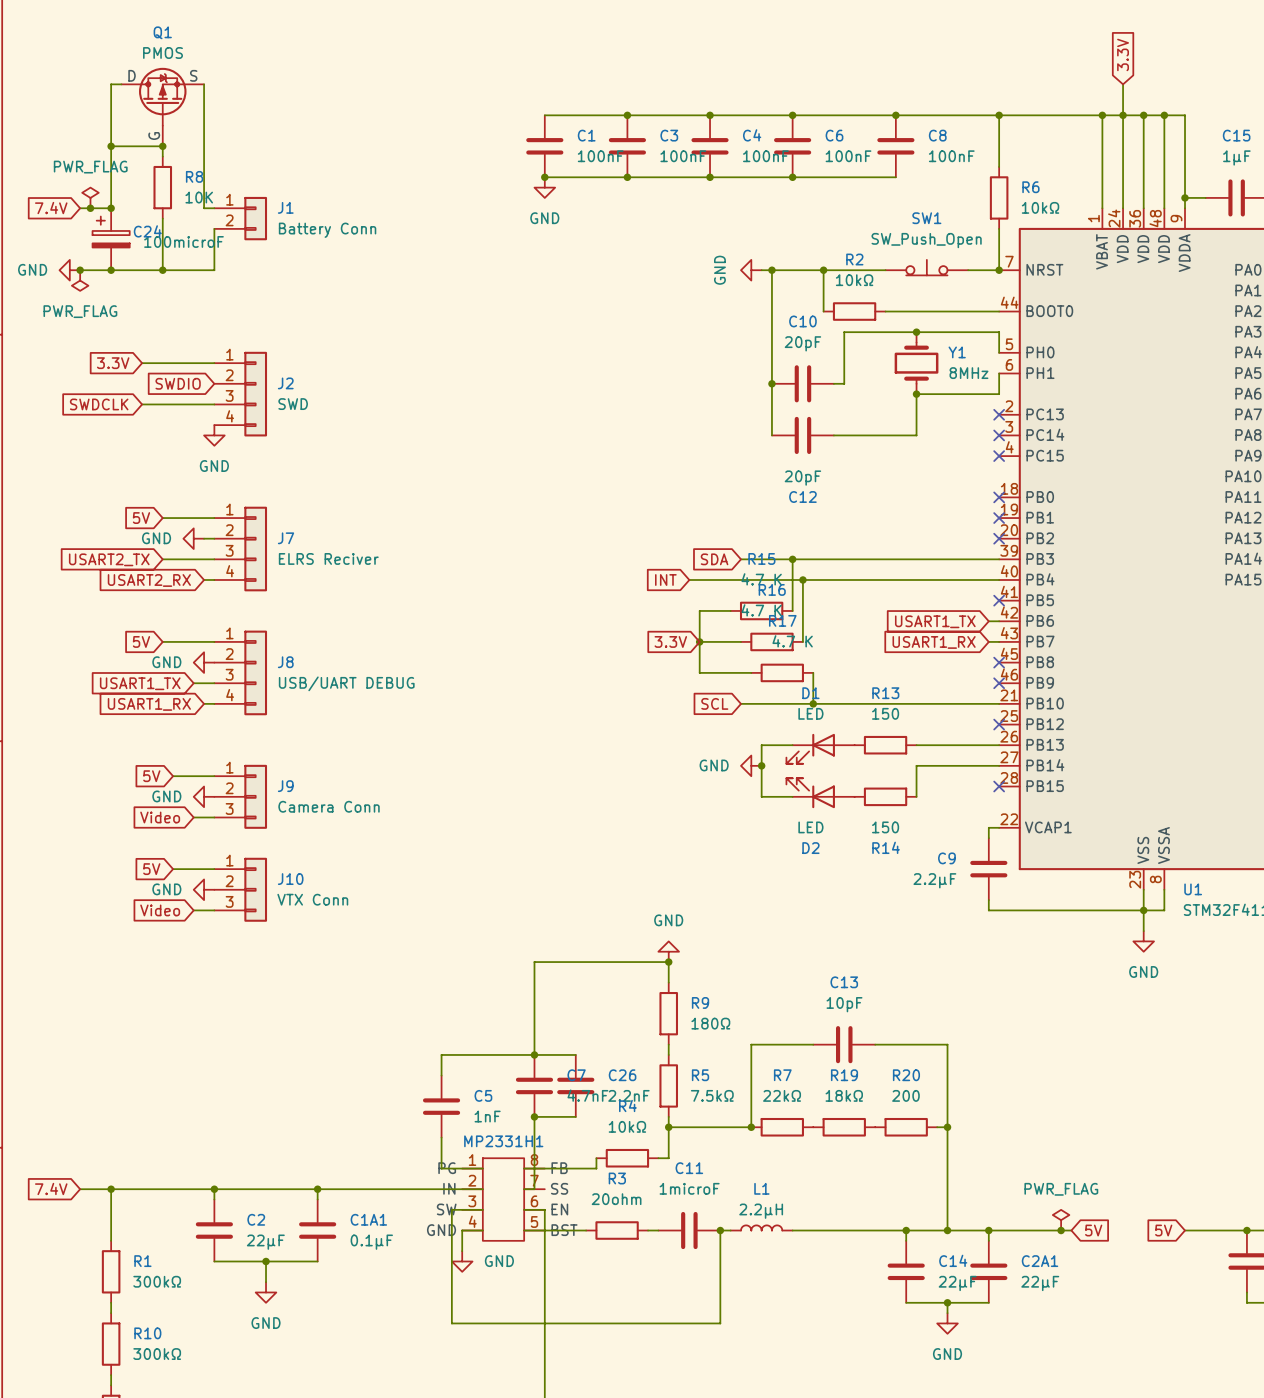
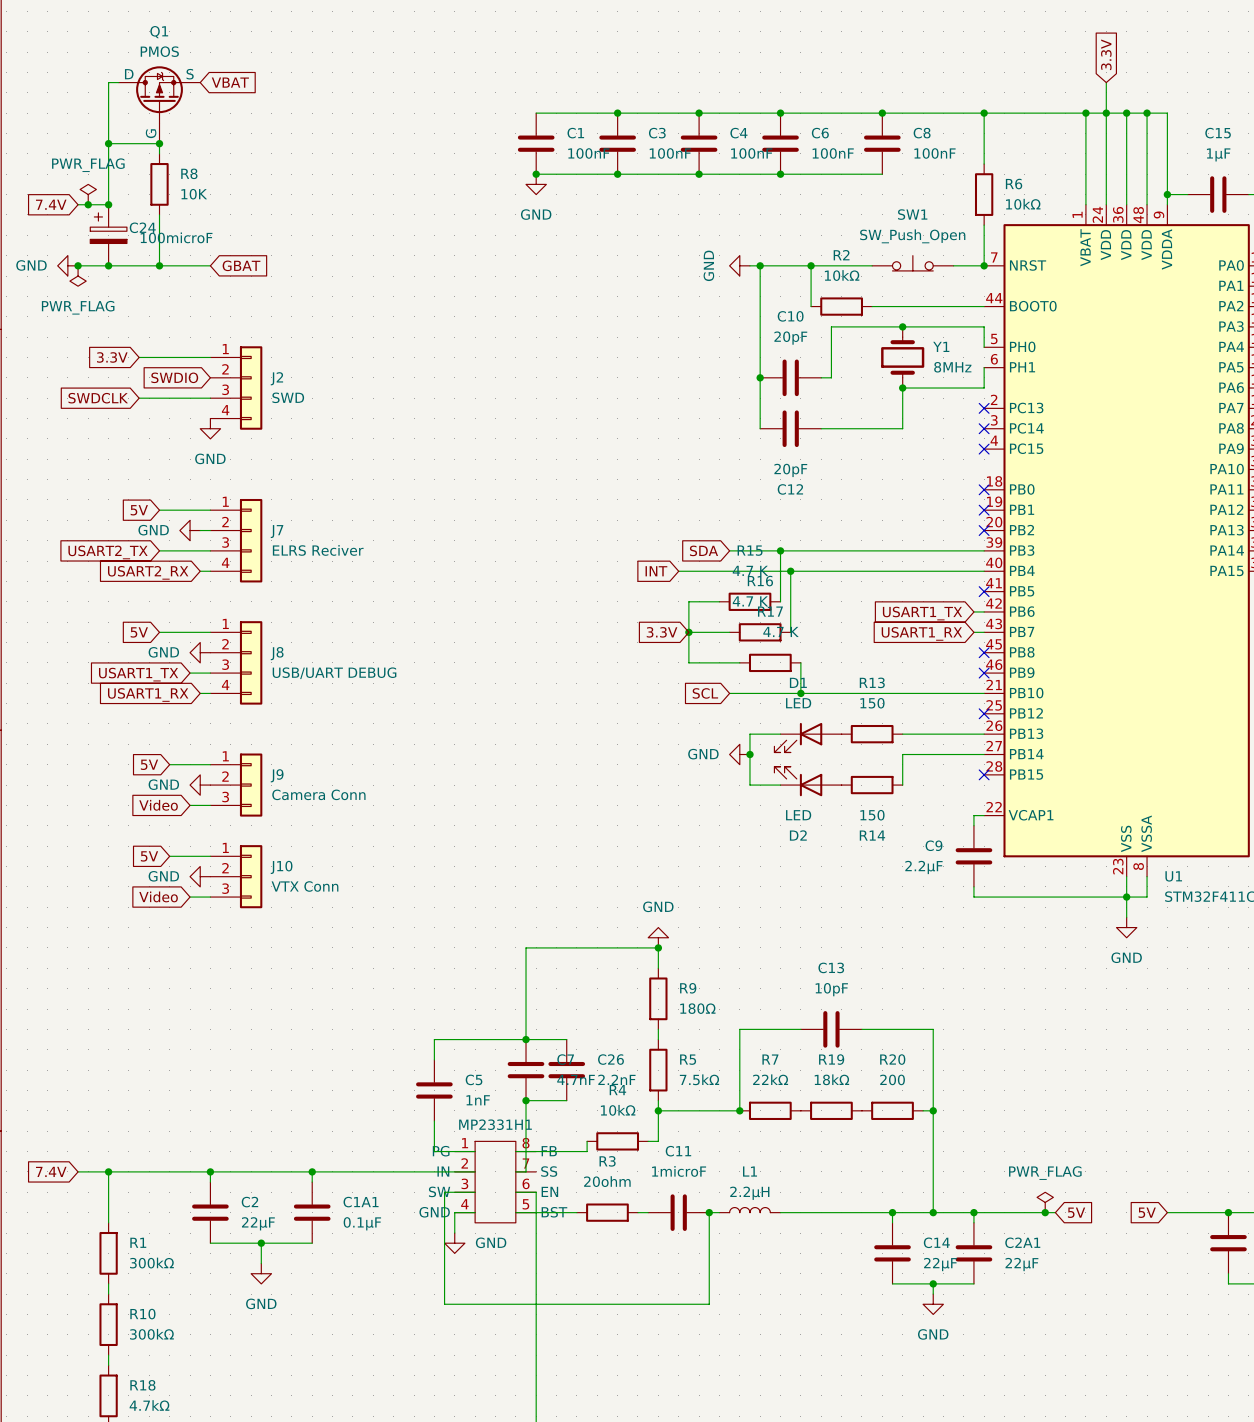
wire: (204, 84) (204, 208) (214, 208) -> none
global label: none -> VBAT (230, 82)
J1: Battery Conn (240, 218) -> none
wire: (214, 228) (214, 270) -> none
global label: none -> GBAT (241, 265)

